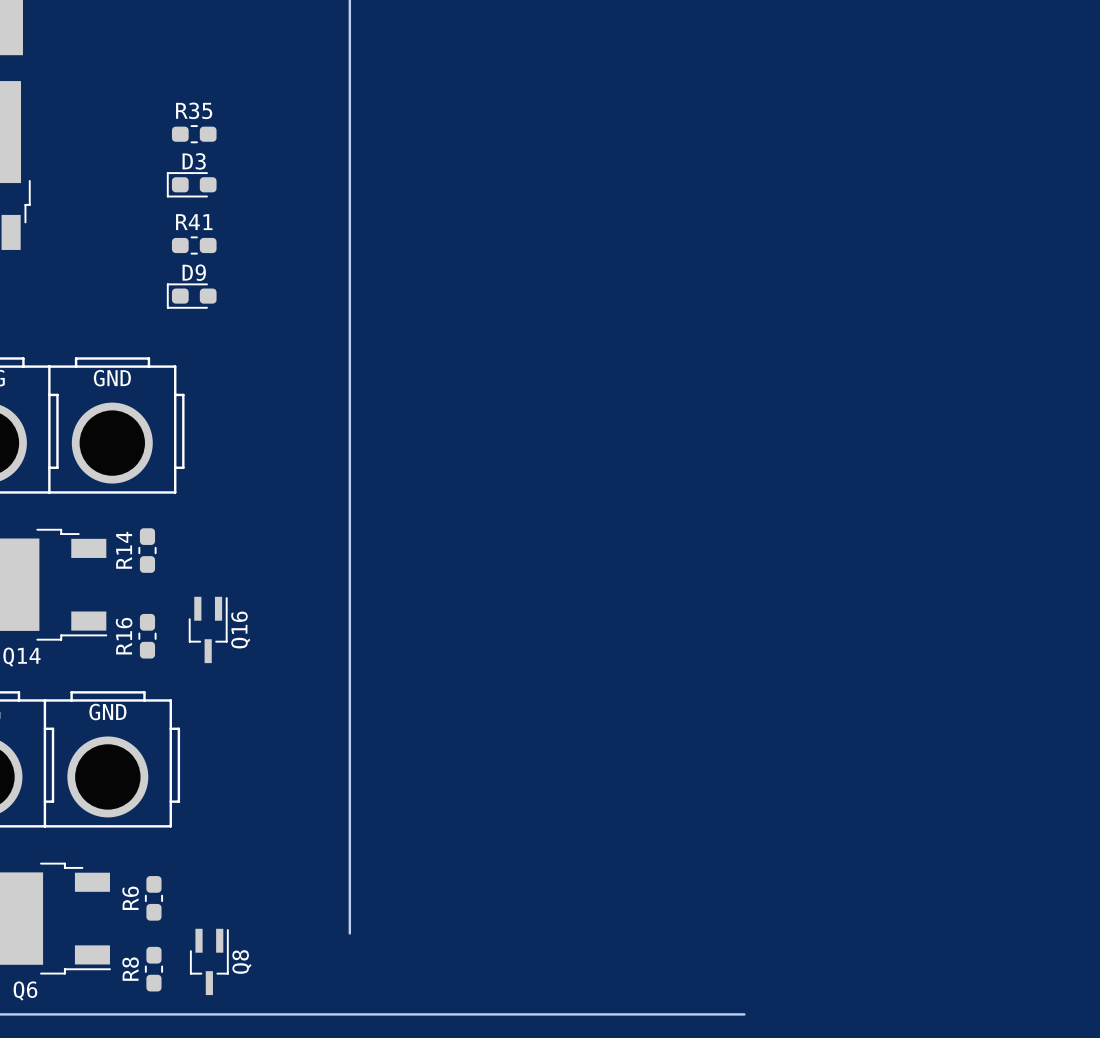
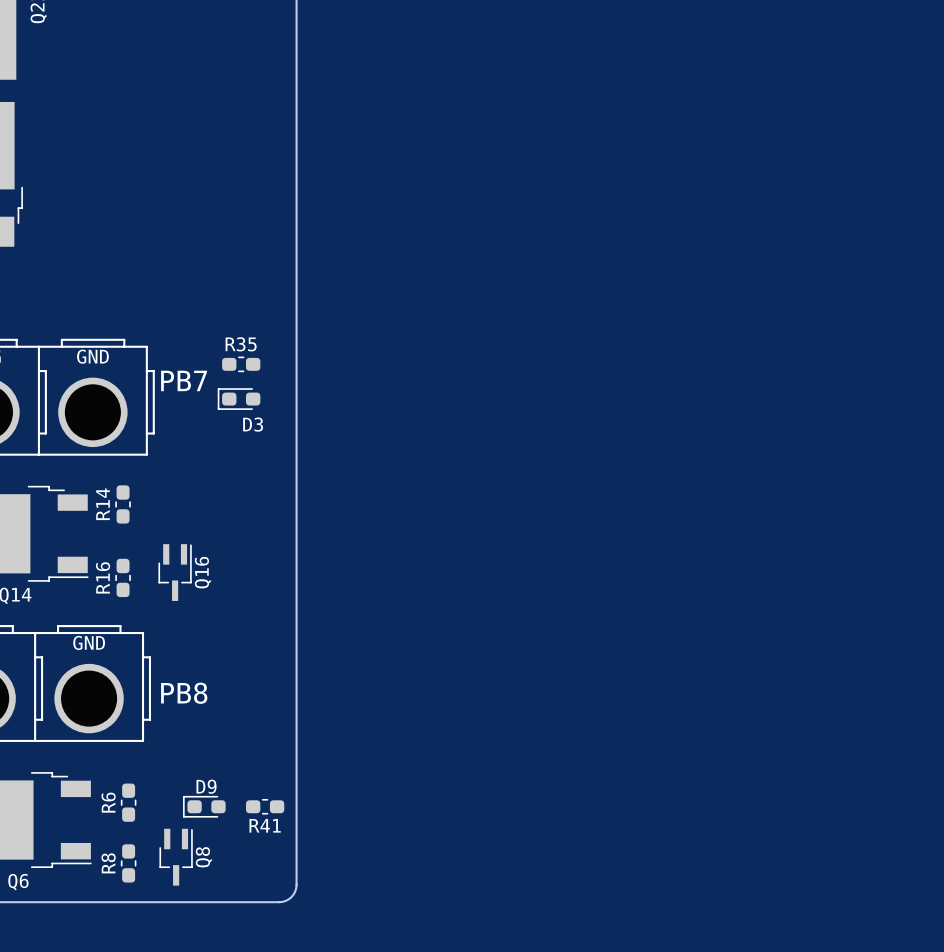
R35 position: (194, 134) -> (241, 364)
D3 name position: D3 (194, 161) -> D3 (253, 424)
D3 position: (191, 184) -> (239, 399)
R41 name position: R41 (194, 222) -> R41 (265, 825)
R41 position: (194, 245) -> (265, 806)
D9 position: (191, 296) -> (204, 806)
text: none -> PB7 (184, 380)
text: none -> PB8 (184, 693)
board edge: (329, 1014) (744, 1014) -> (279, 902) (289, 898) (295, 889) (296, 832)

